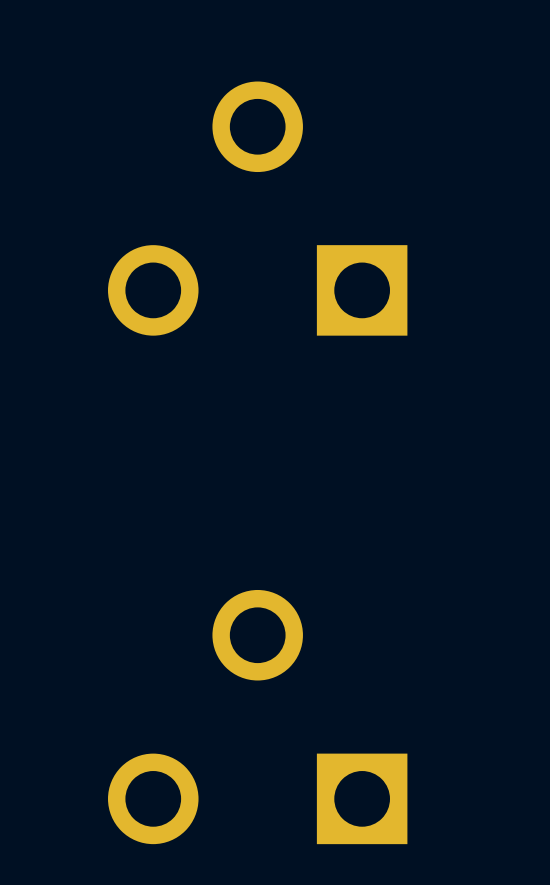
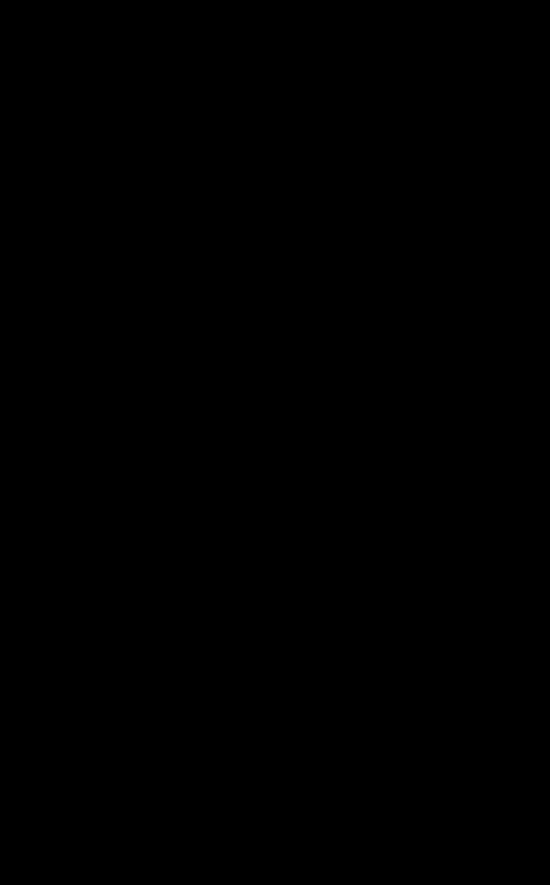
part: (257, 208) -> none
part: (257, 717) -> none

